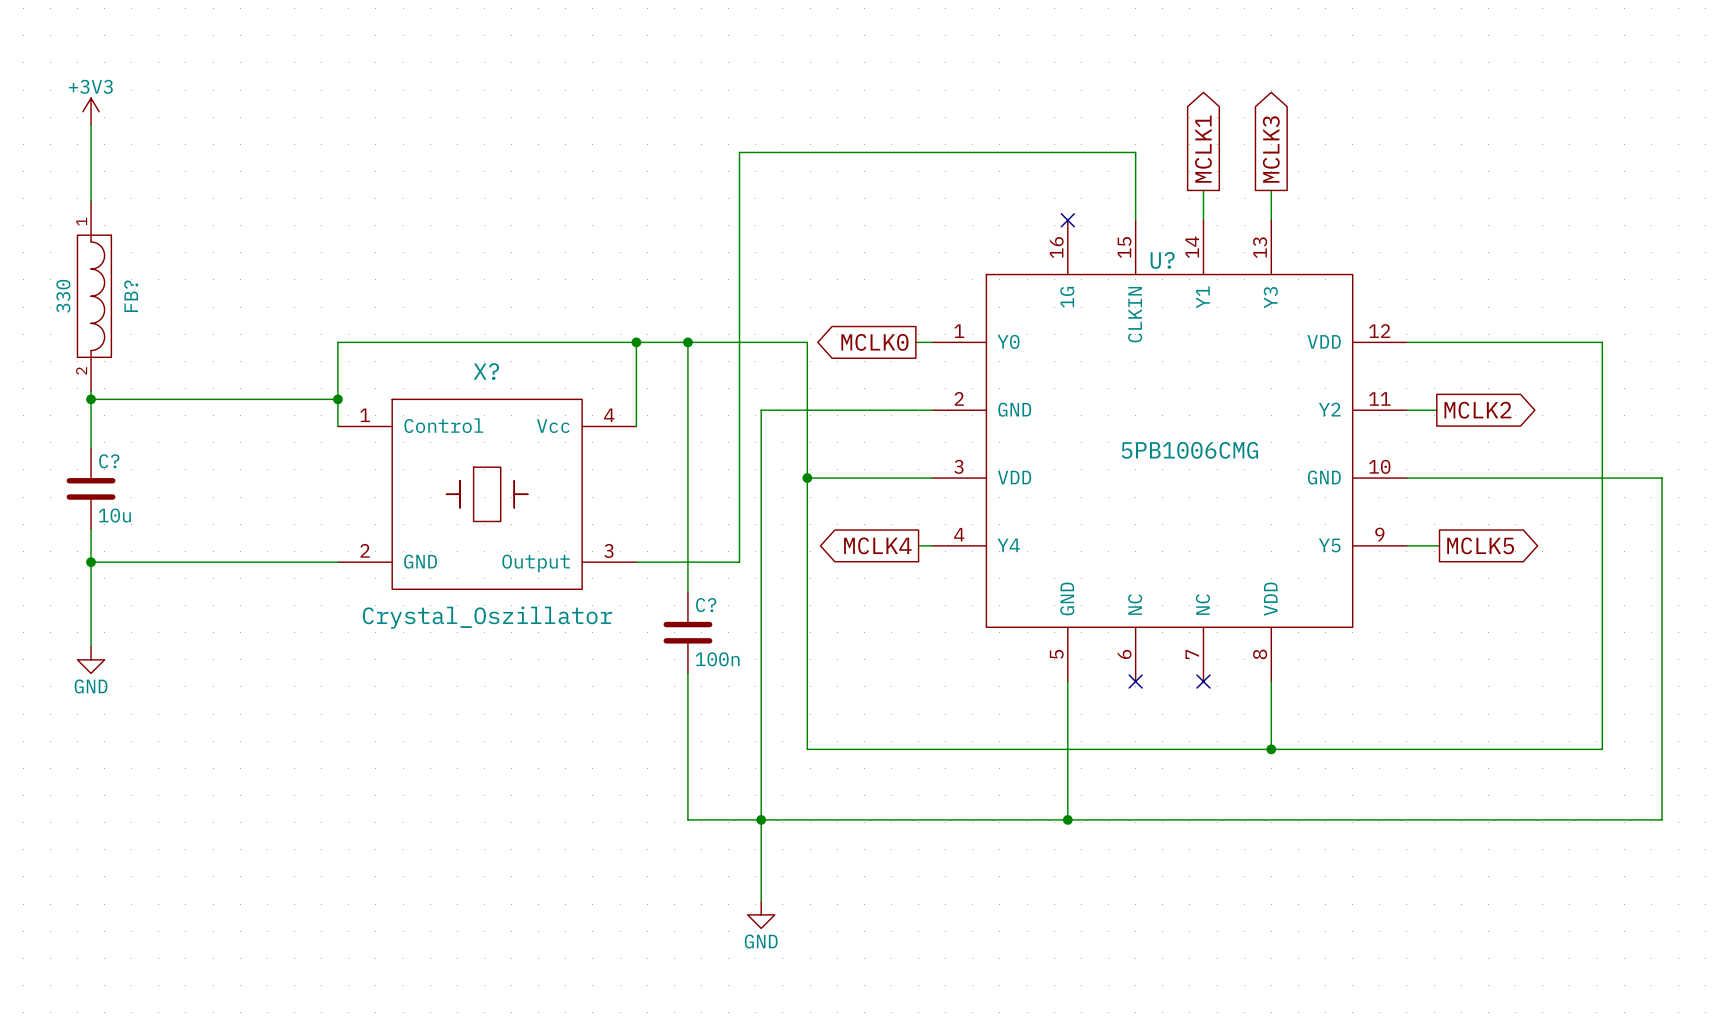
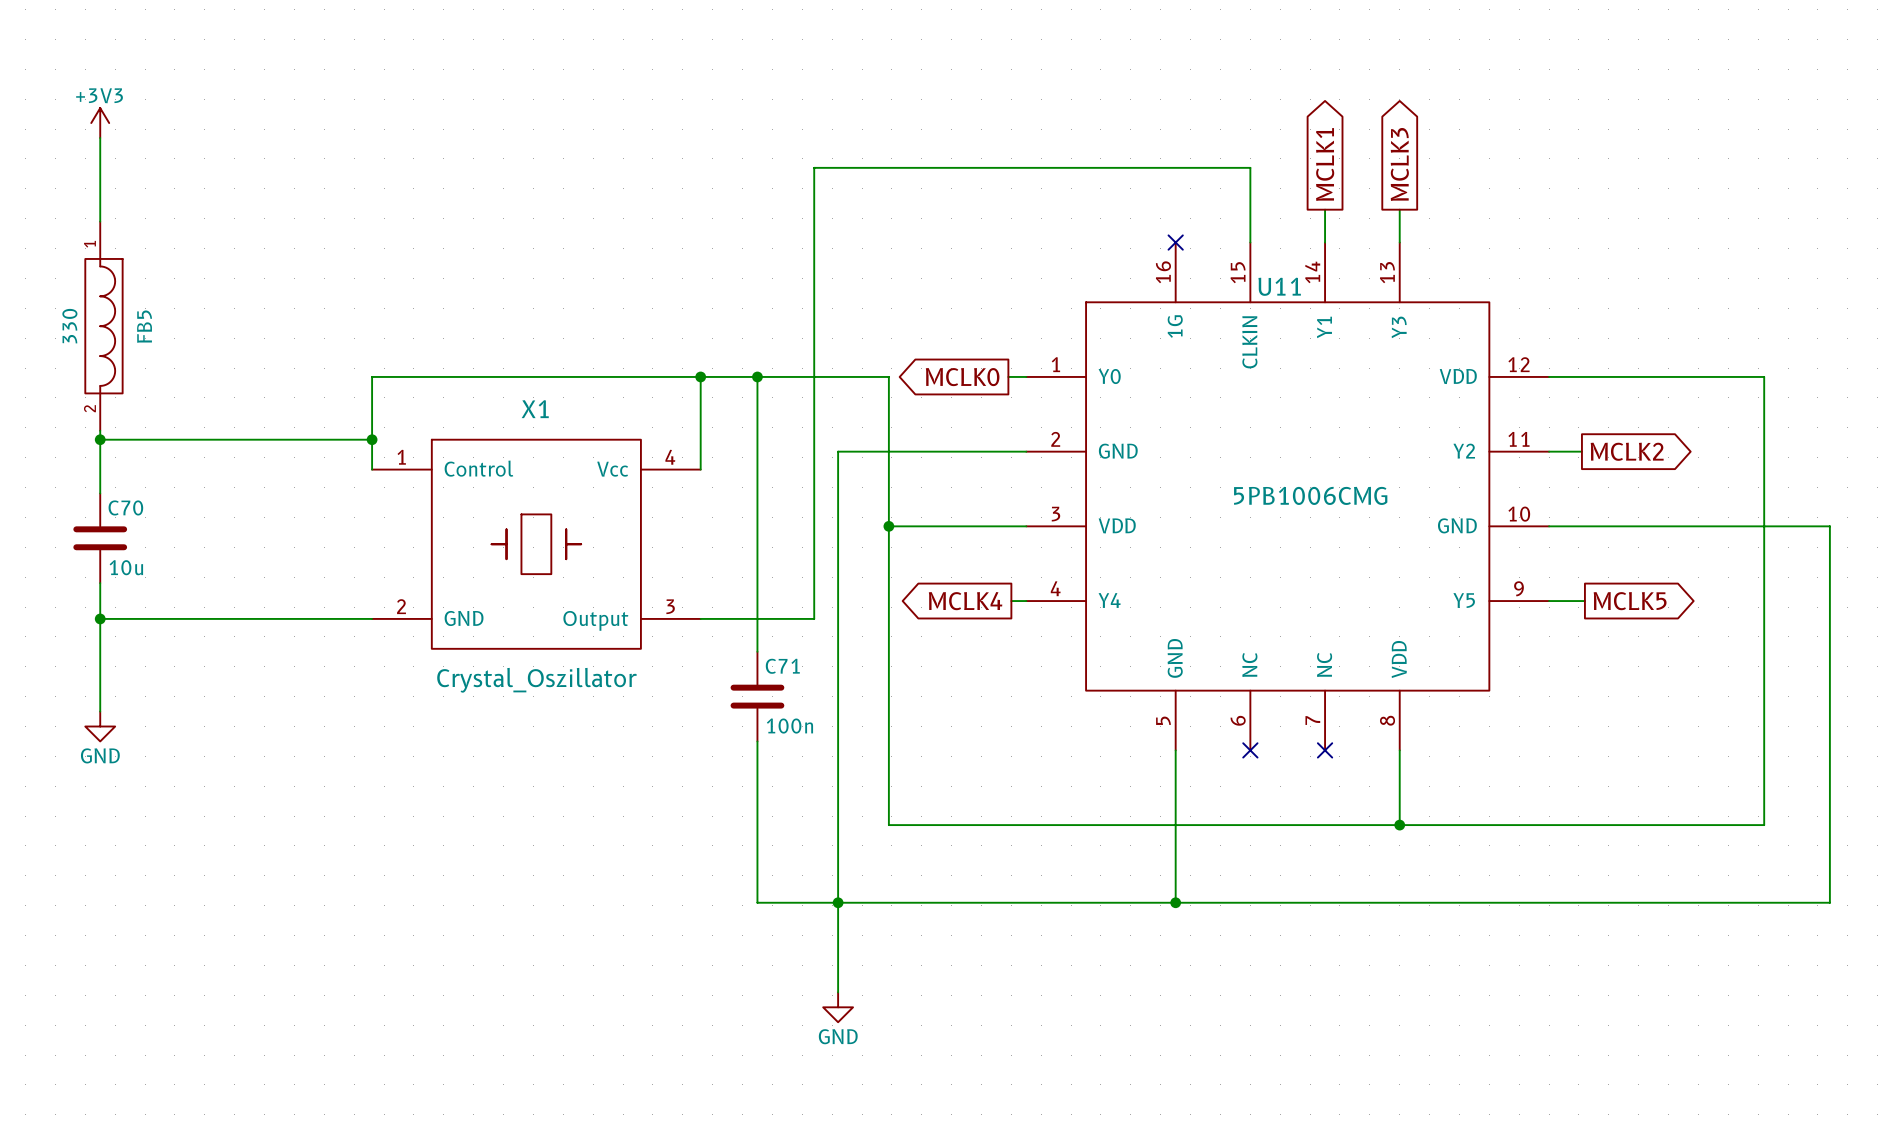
U? name: U? (1162, 260) -> U11 (1279, 286)
FB? name: FB? (131, 296) -> FB5 (144, 326)
X? name: X? (486, 371) -> X1 (535, 409)
C? name: C? (109, 461) -> C70 (125, 507)
C? name: C? (706, 605) -> C71 (782, 666)

